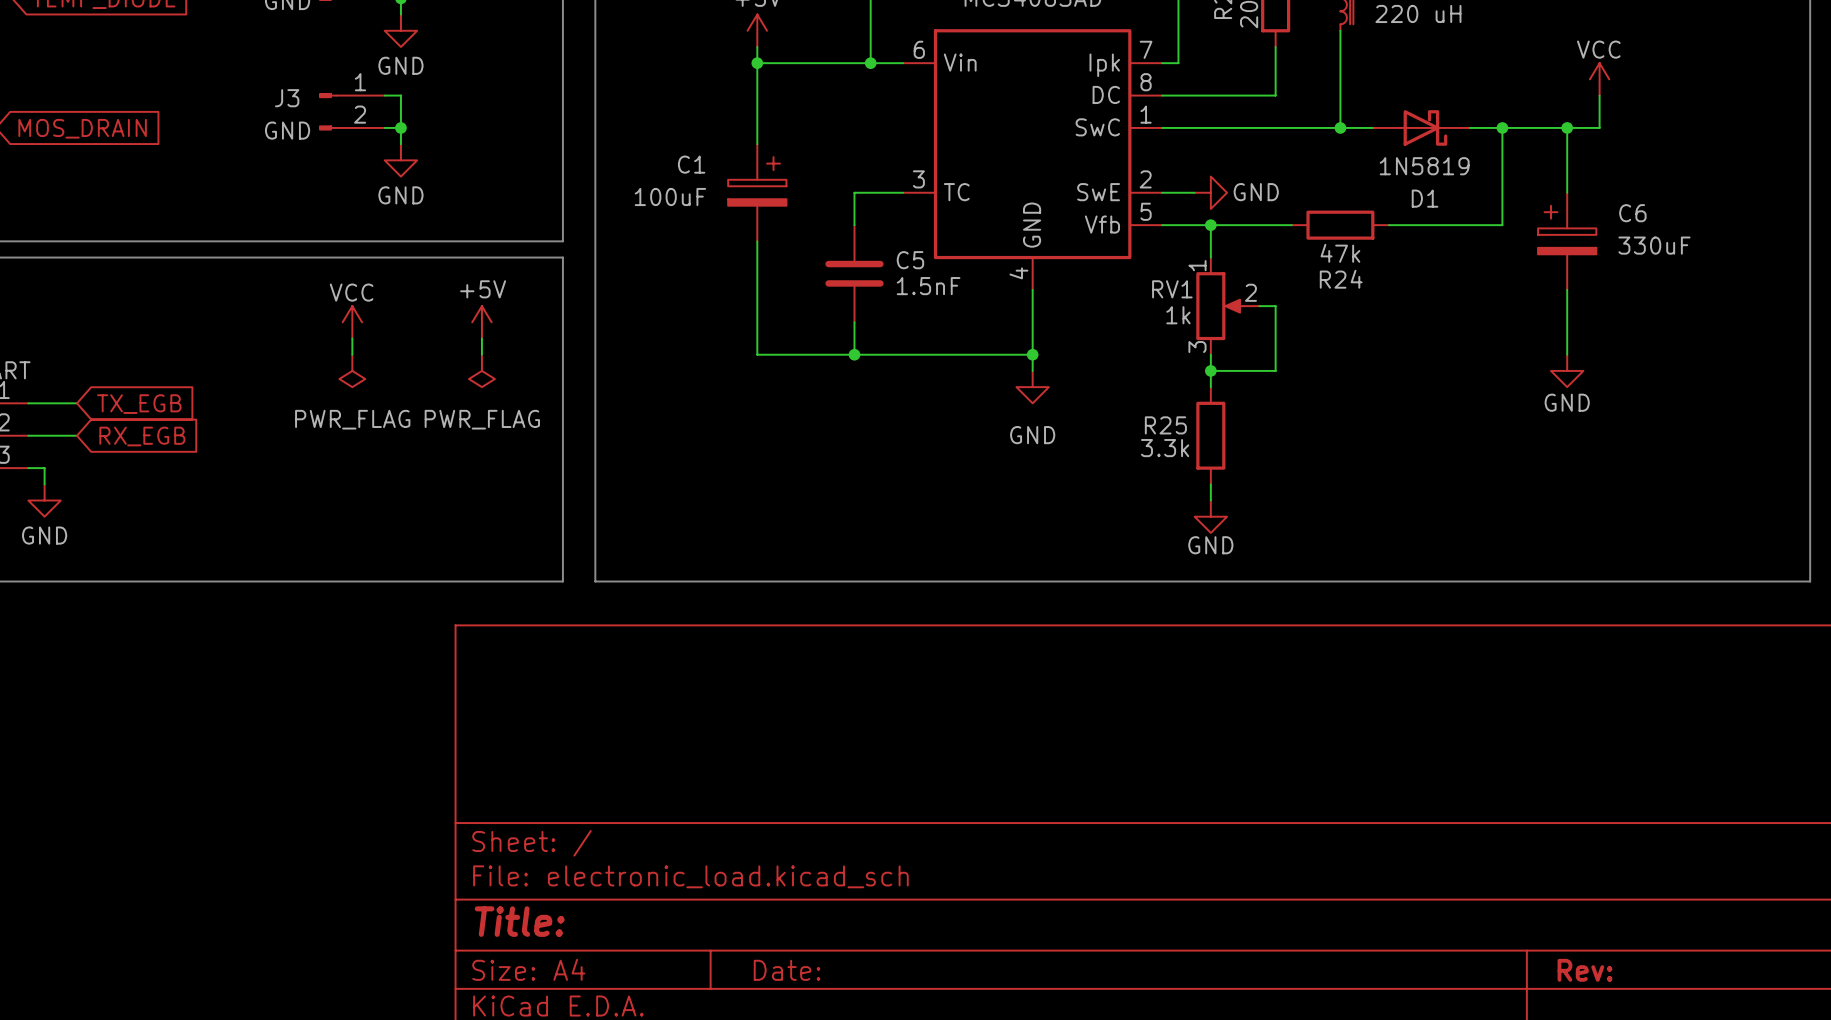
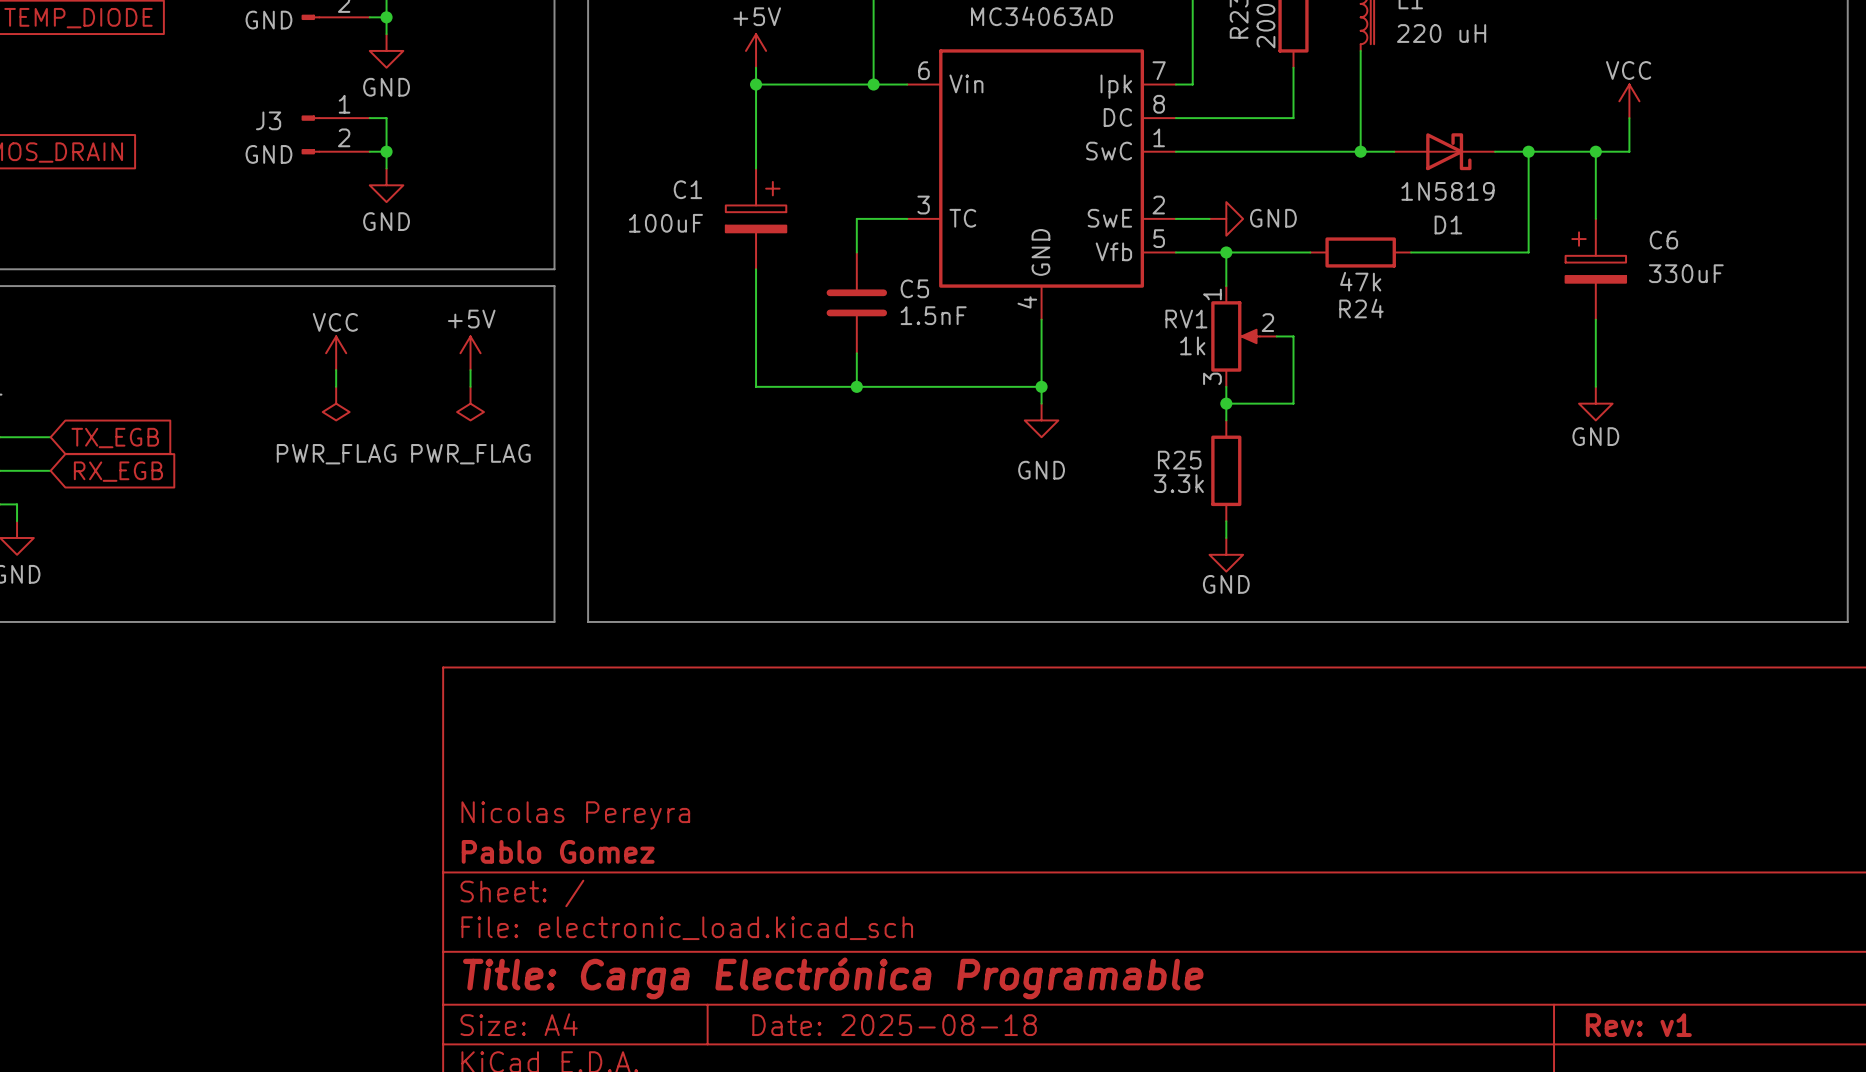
title block: none -> Nicolas Pereyra (575, 815)
title block: none -> Pablo Gomez (558, 851)
title block: Title: (519, 921) -> Title: Carga Electrónica Programable (833, 978)
title block: Date: (787, 970) -> Date: 2025-08-18 (894, 1025)
title block: Rev: (1584, 970) -> Rev: v1 (1638, 1025)

